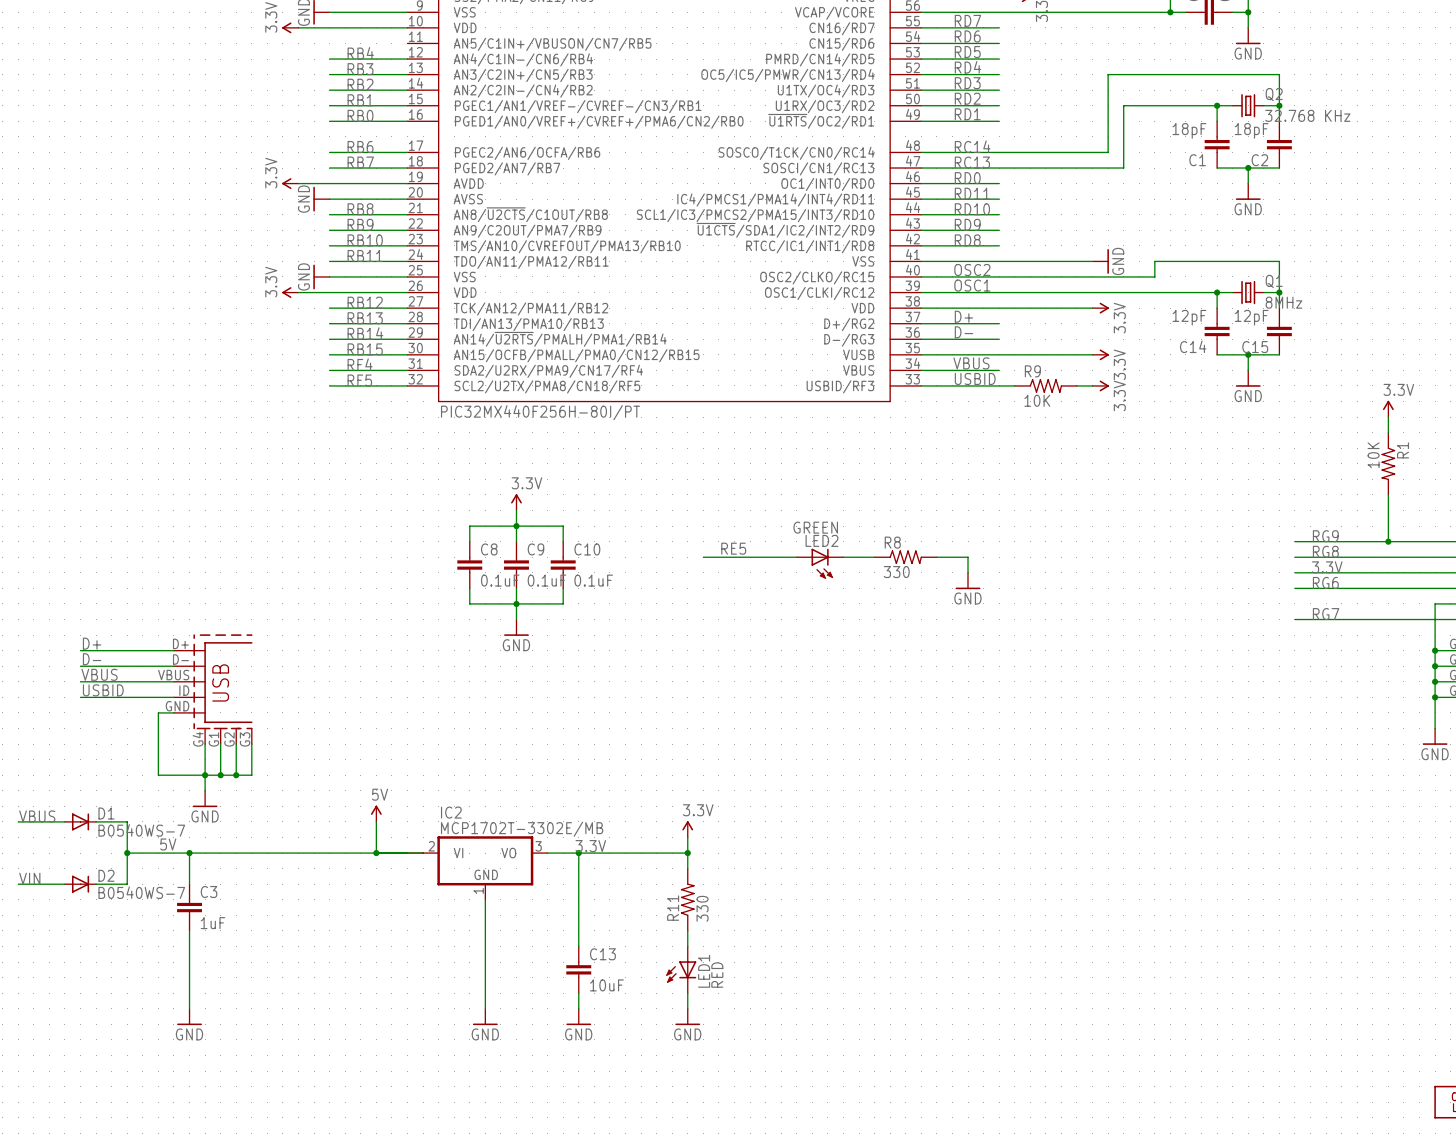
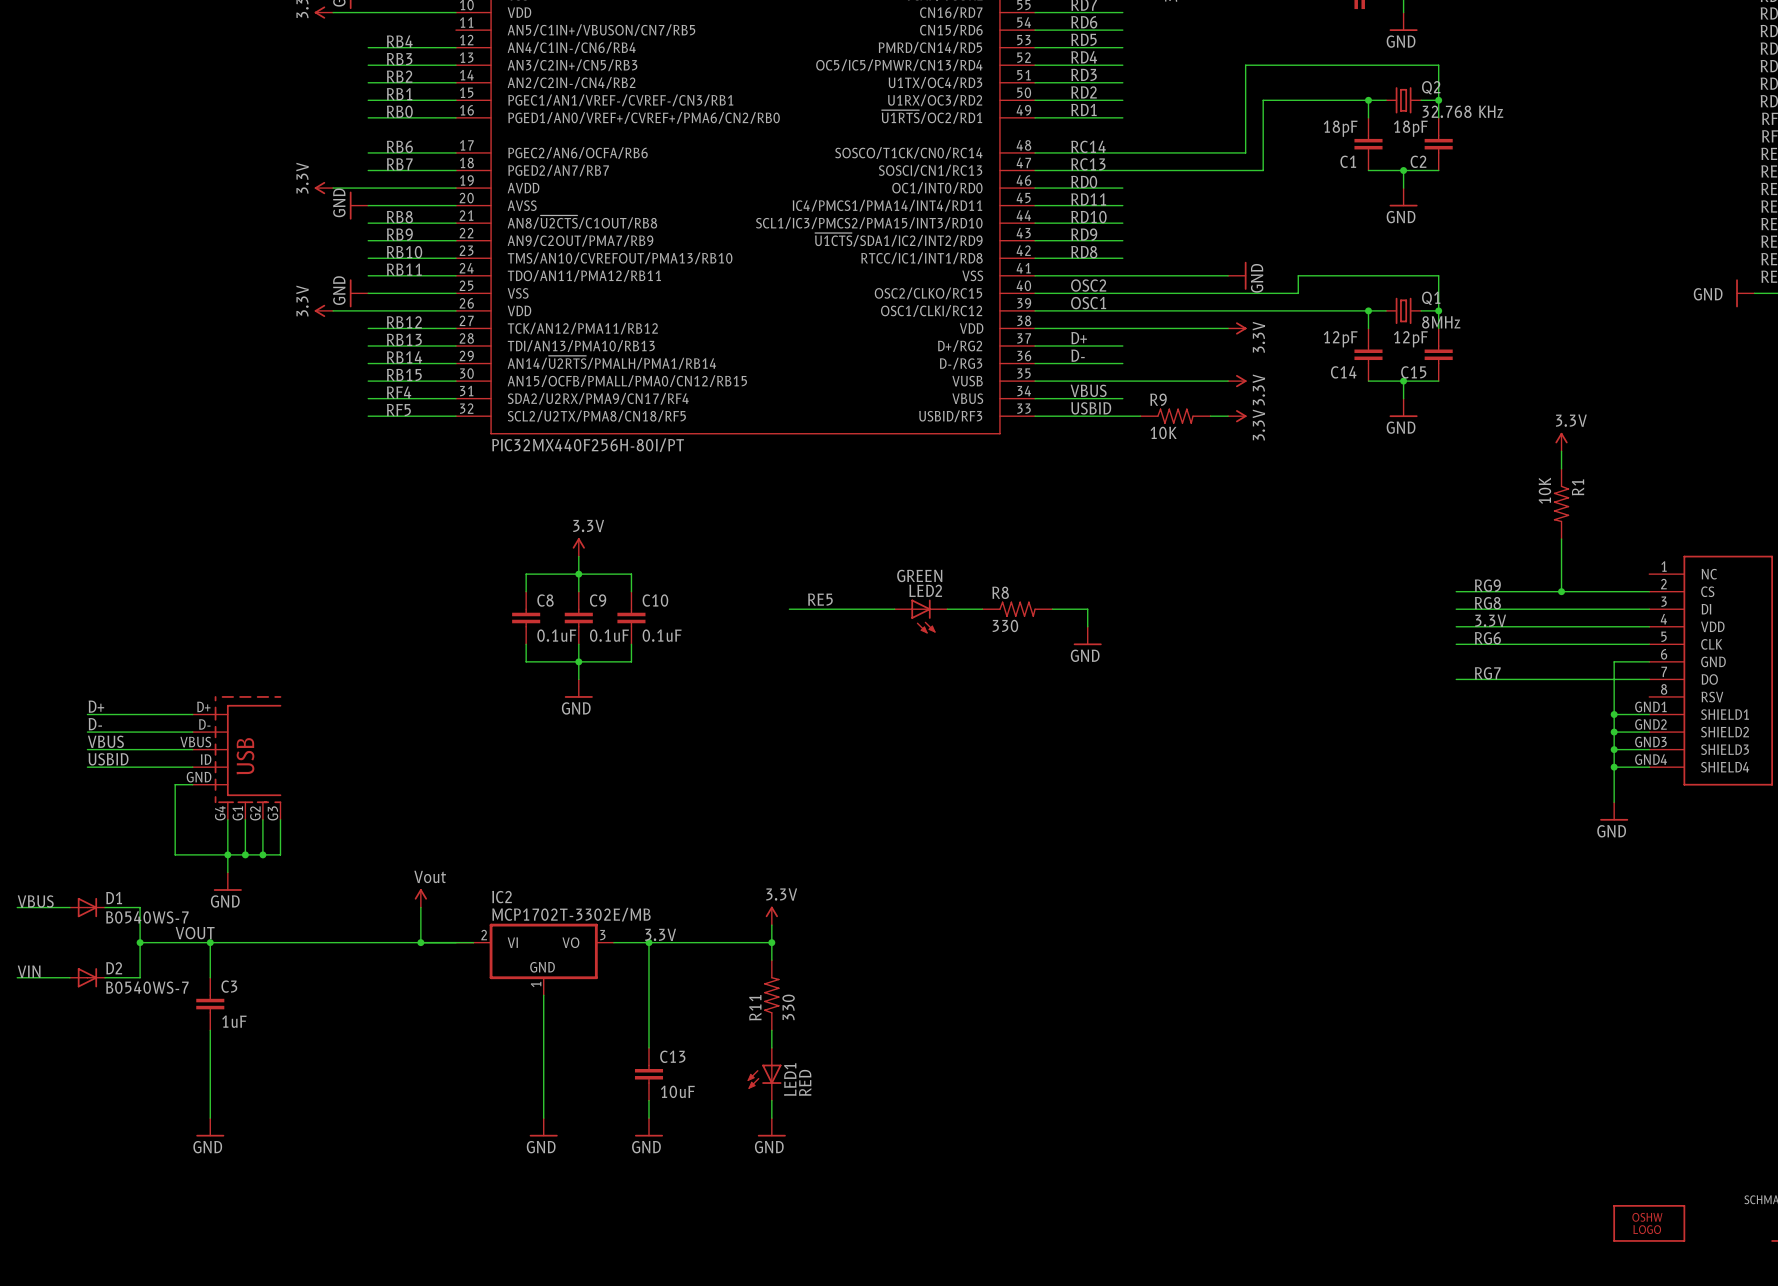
power symbol: 5V (376, 813) -> Vout (420, 898)
label: 5V (168, 844) -> VOUT (195, 933)

